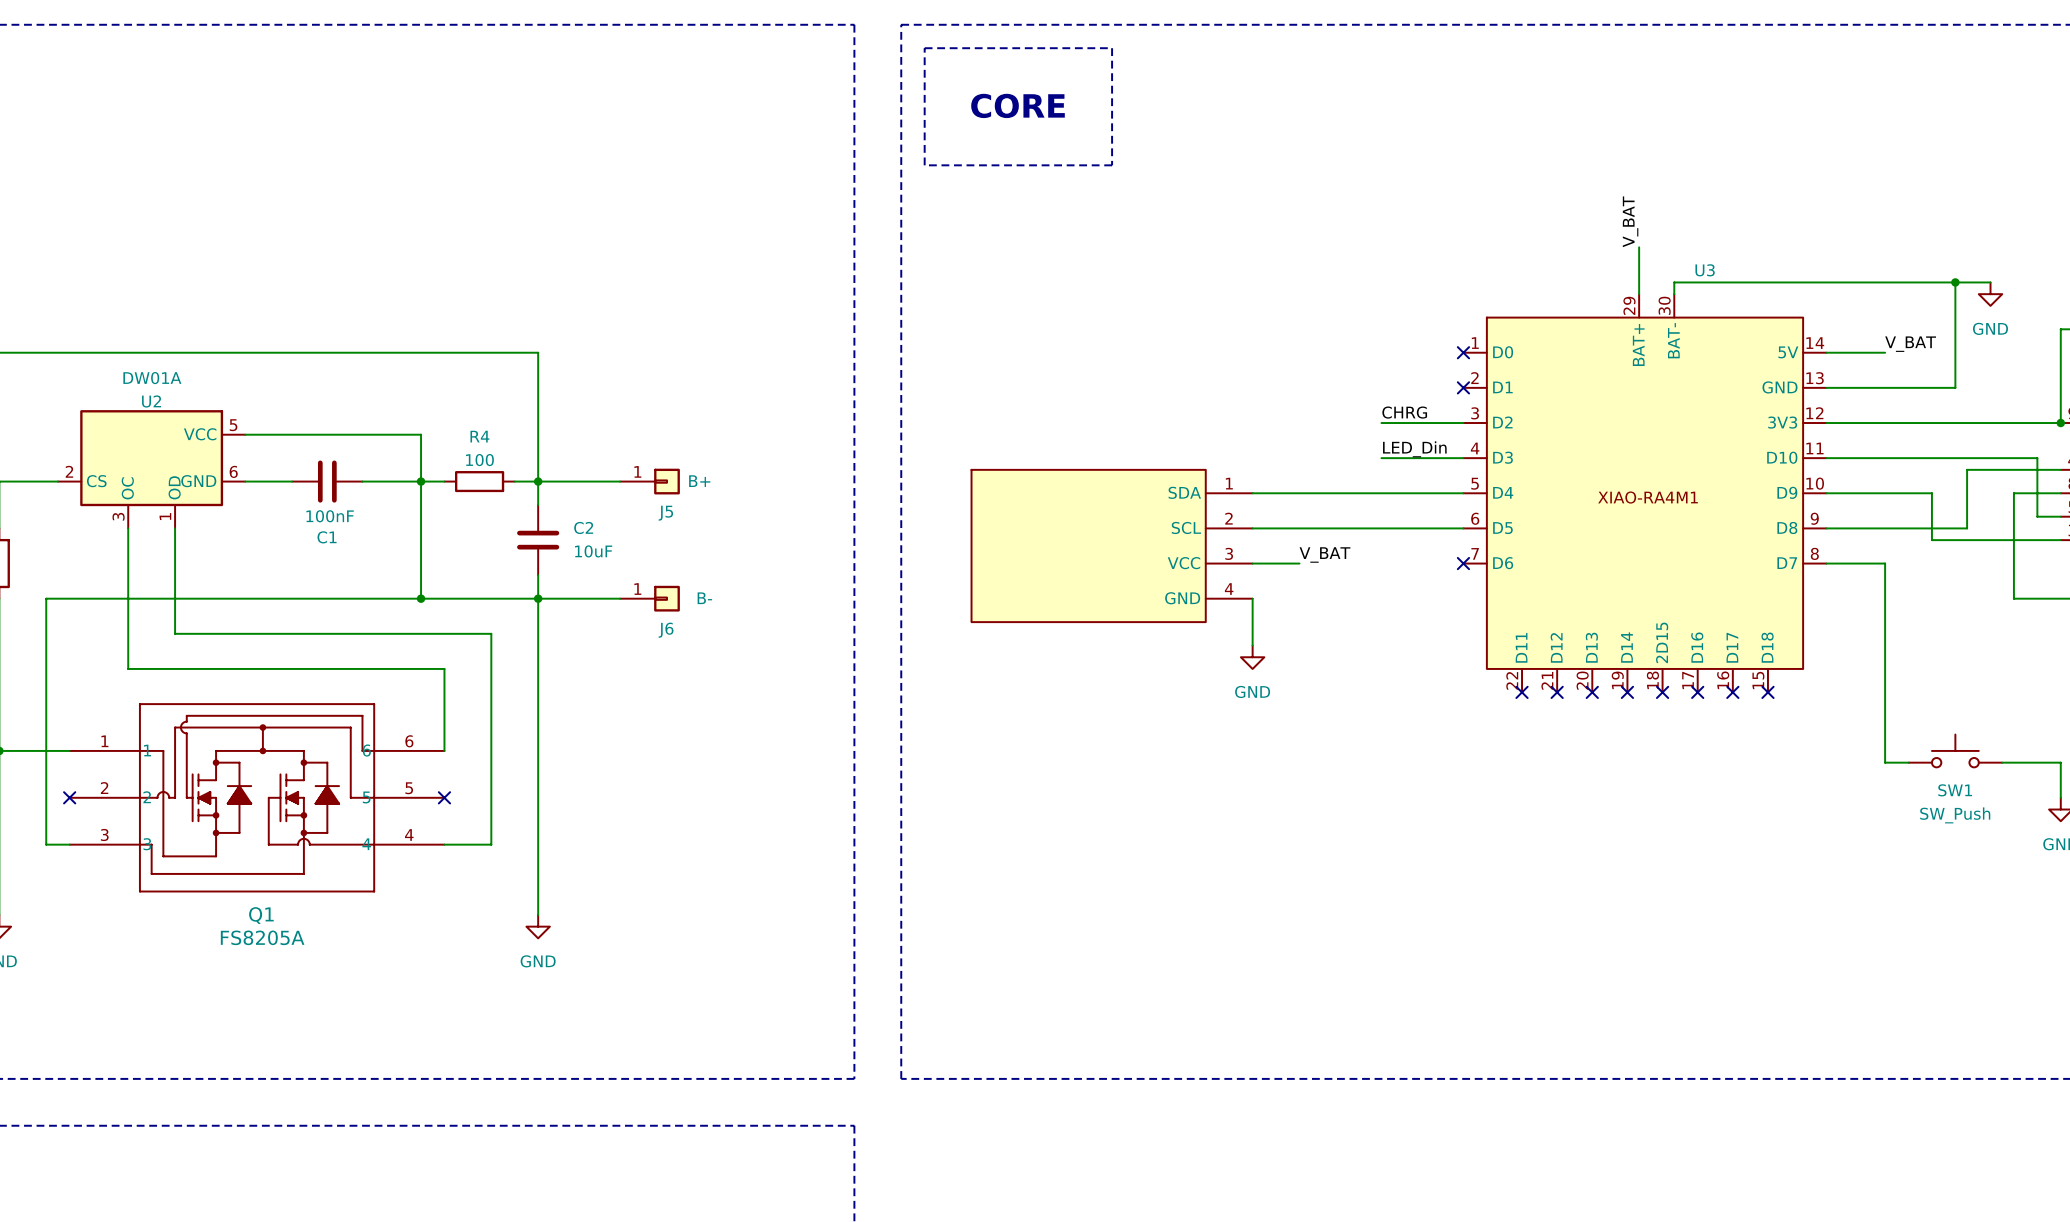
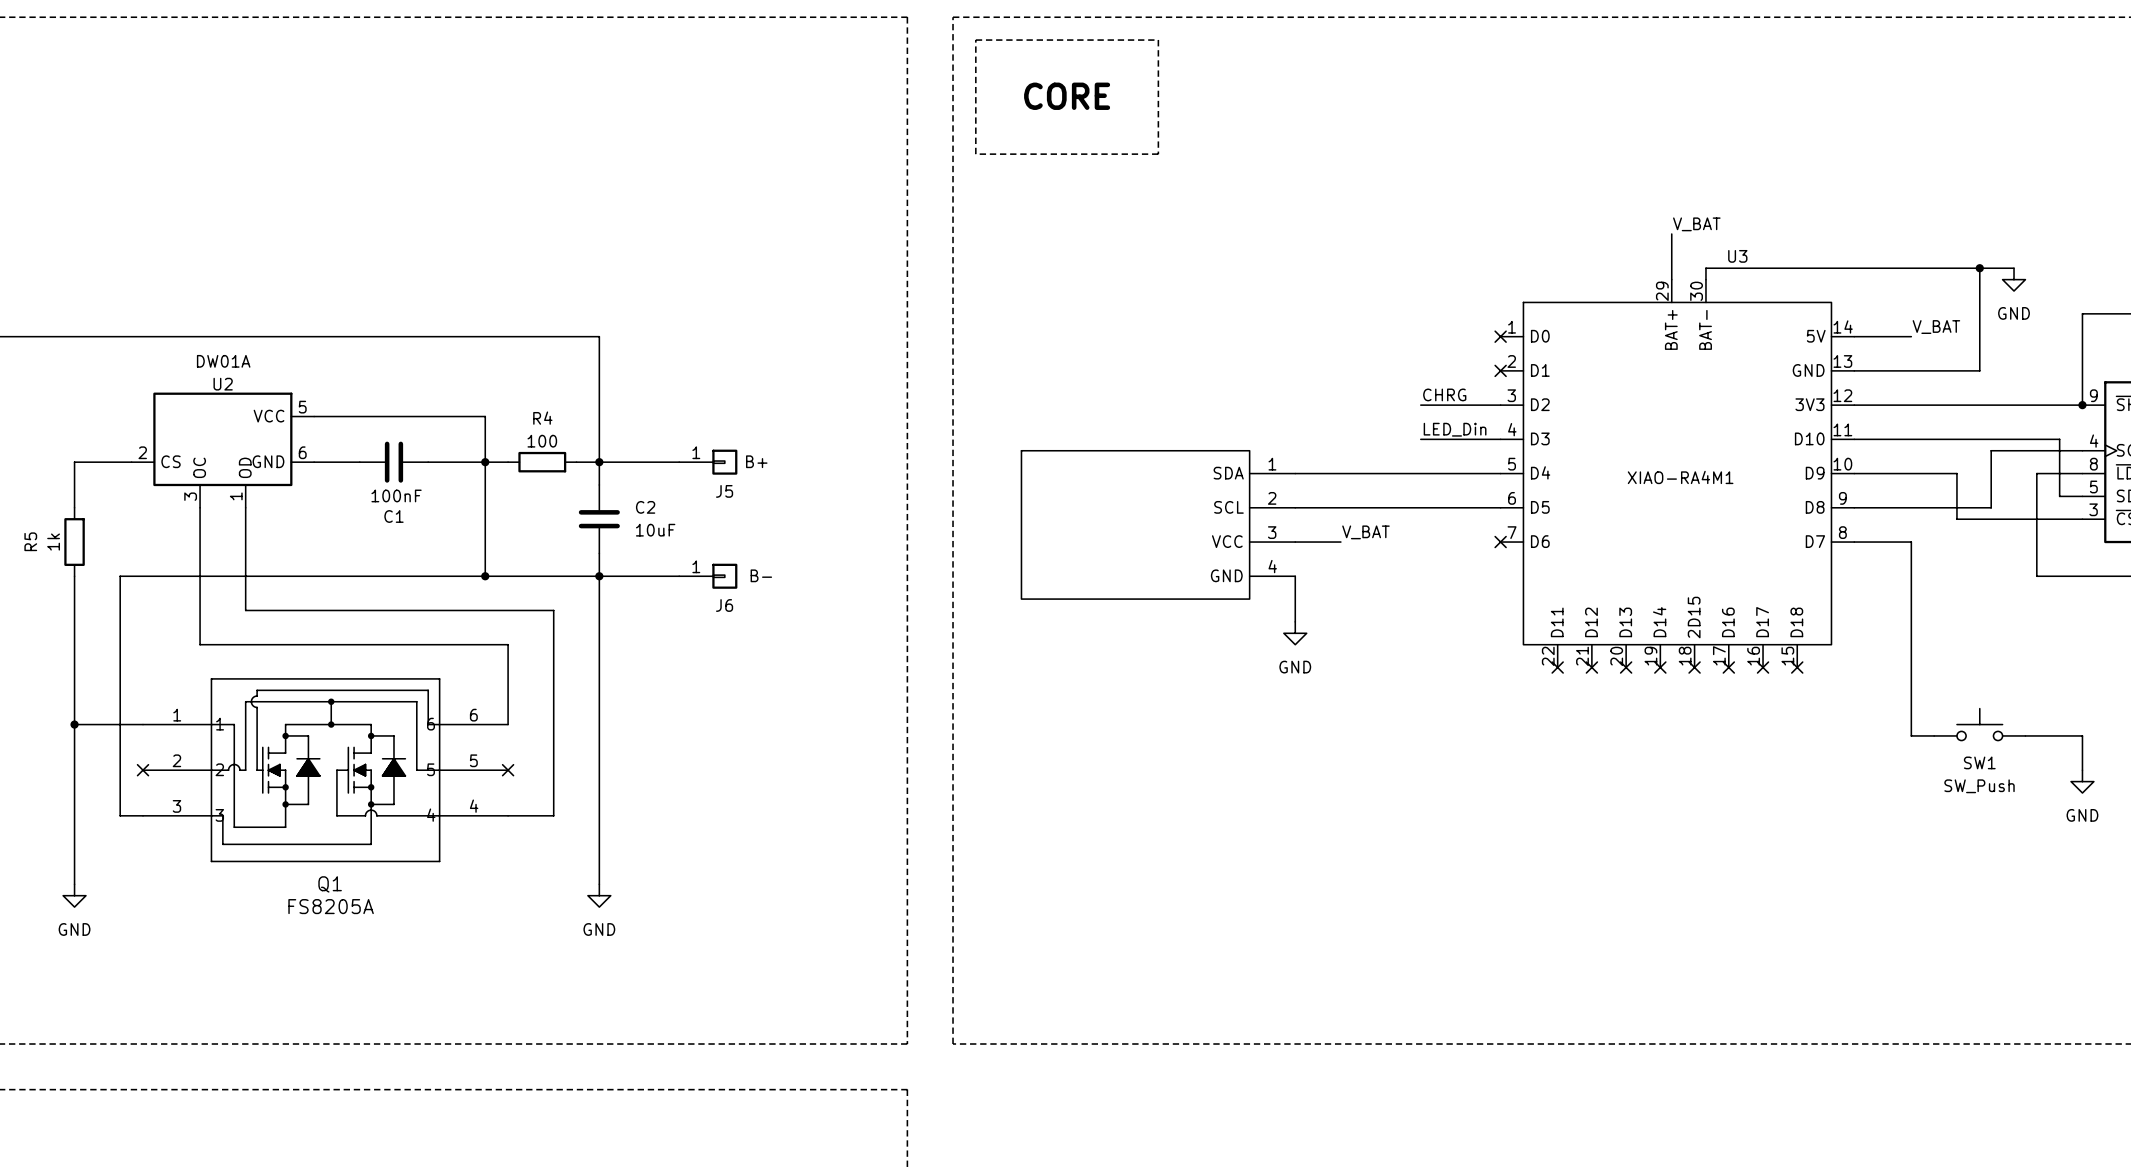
label rotation: 0° (1630, 221) -> 90° clockwise (1696, 224)

